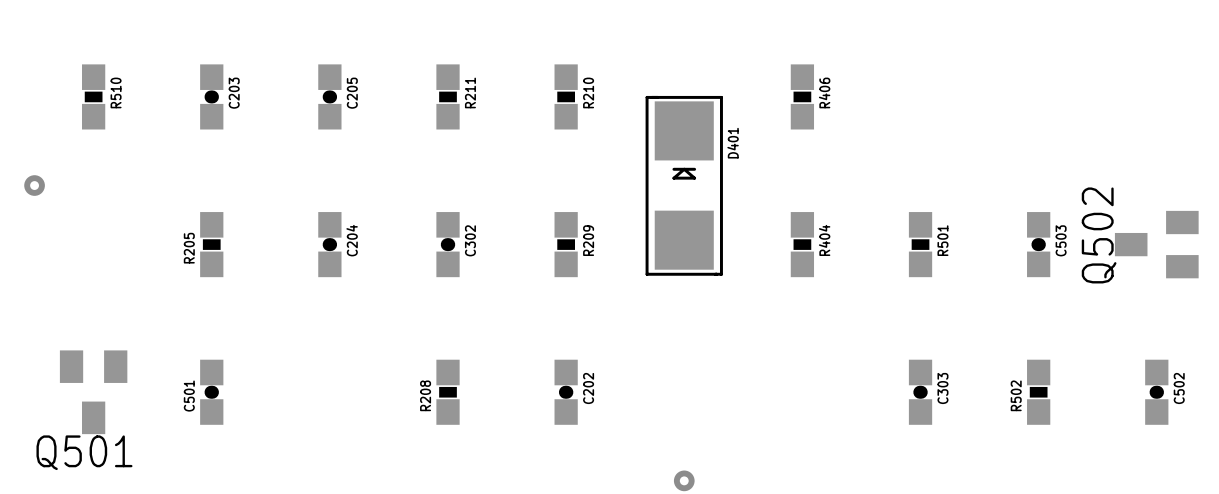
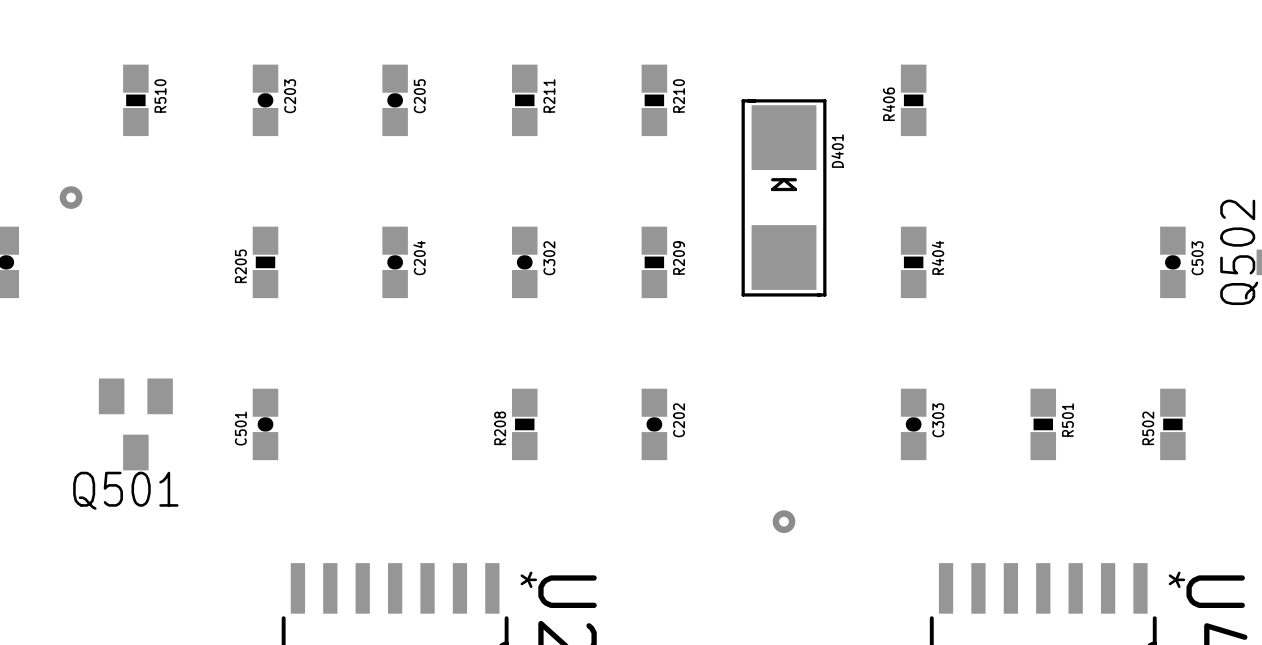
R406 name position: R406 (824, 92) -> R406 (888, 104)
R501 position: (920, 244) -> (1043, 424)
C303 position: (920, 392) -> (913, 424)

